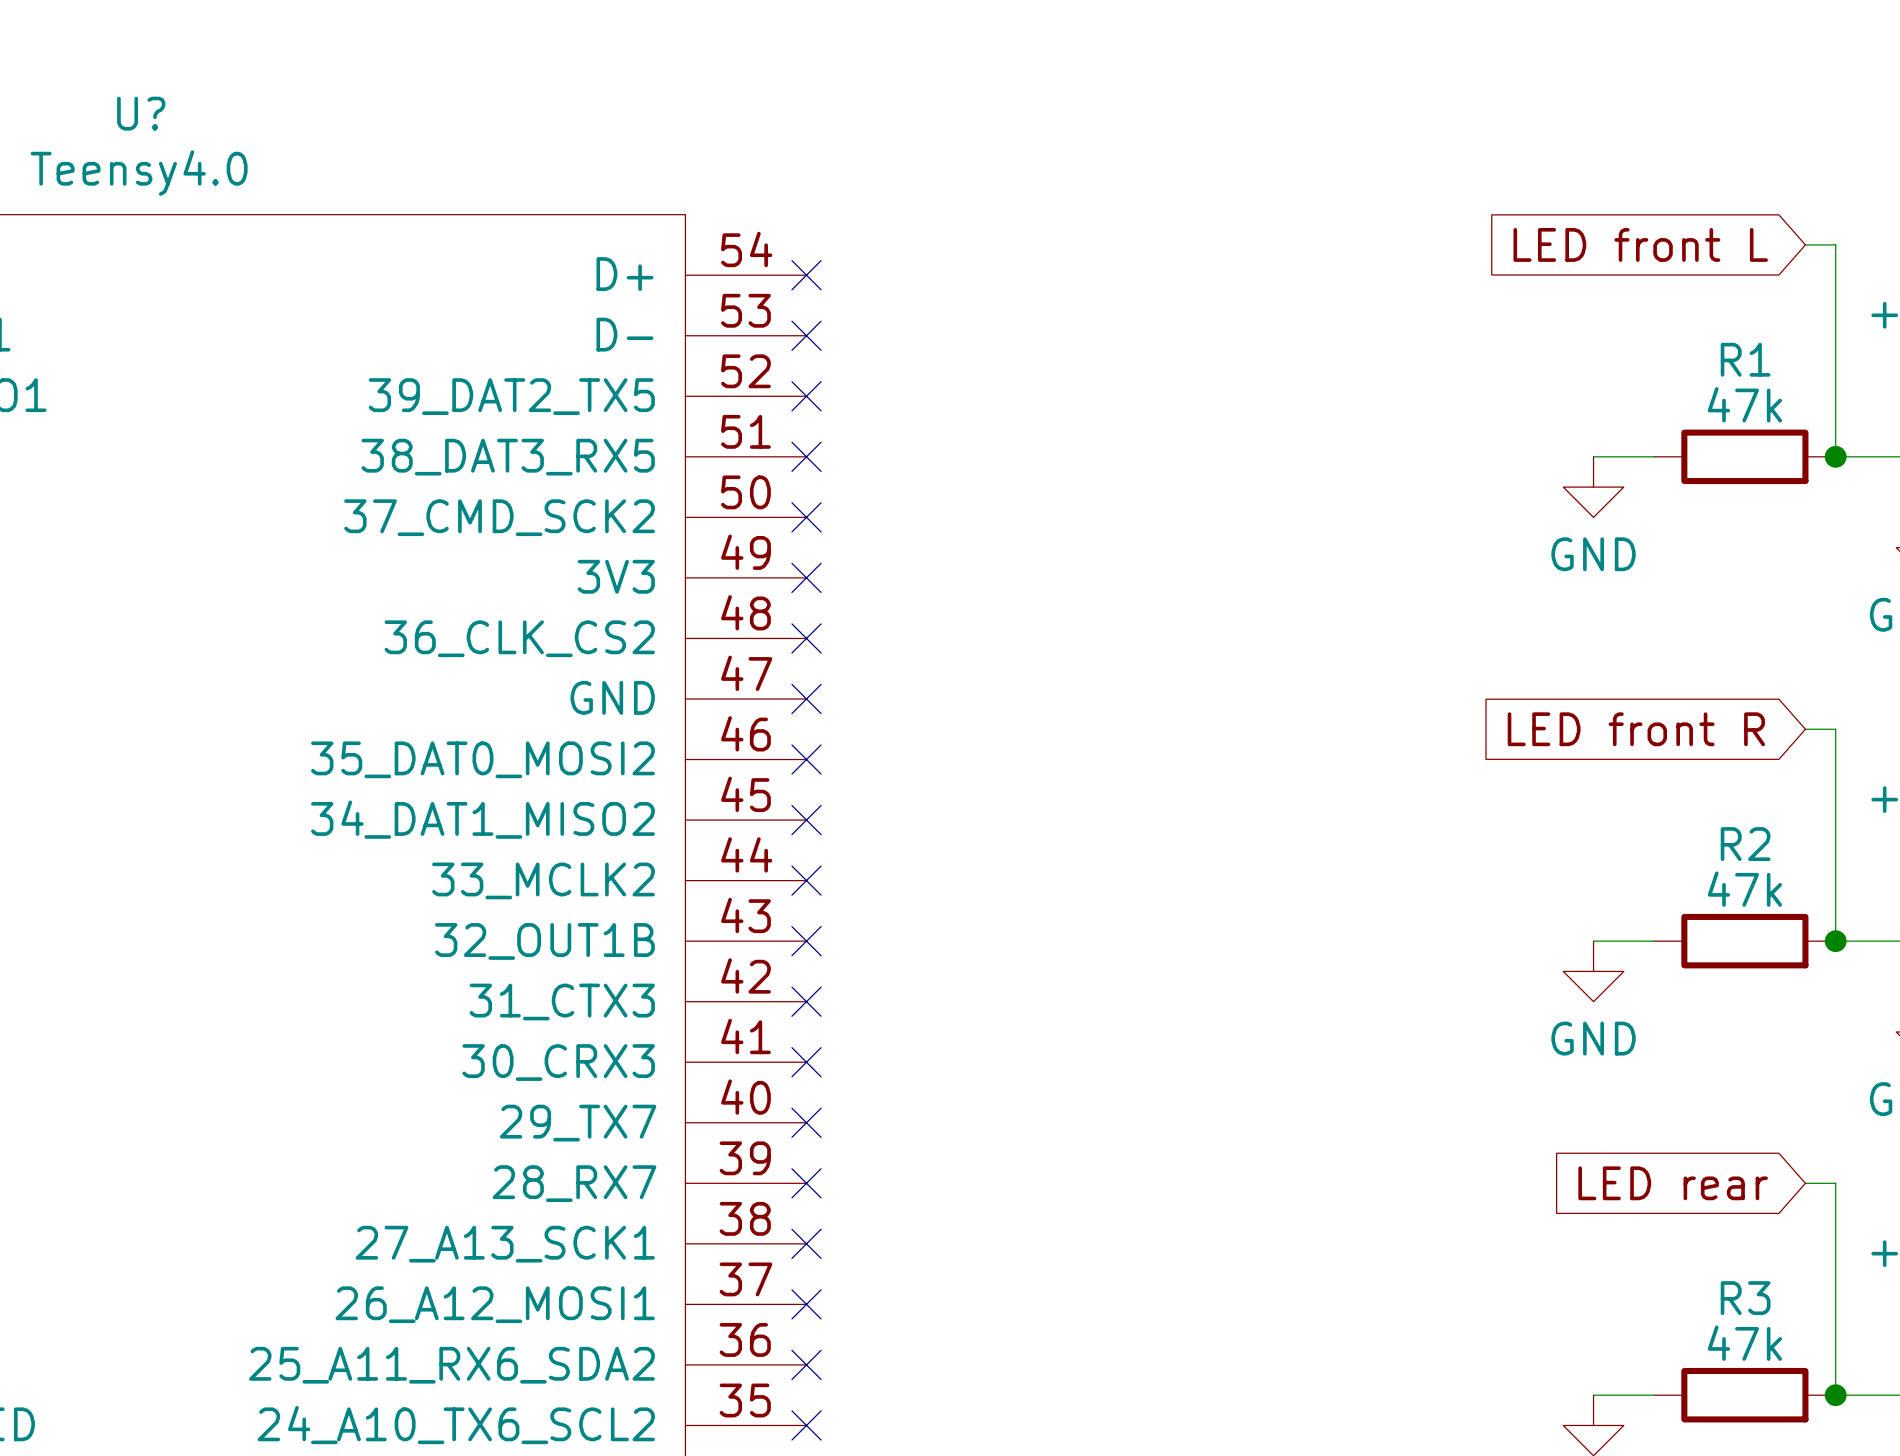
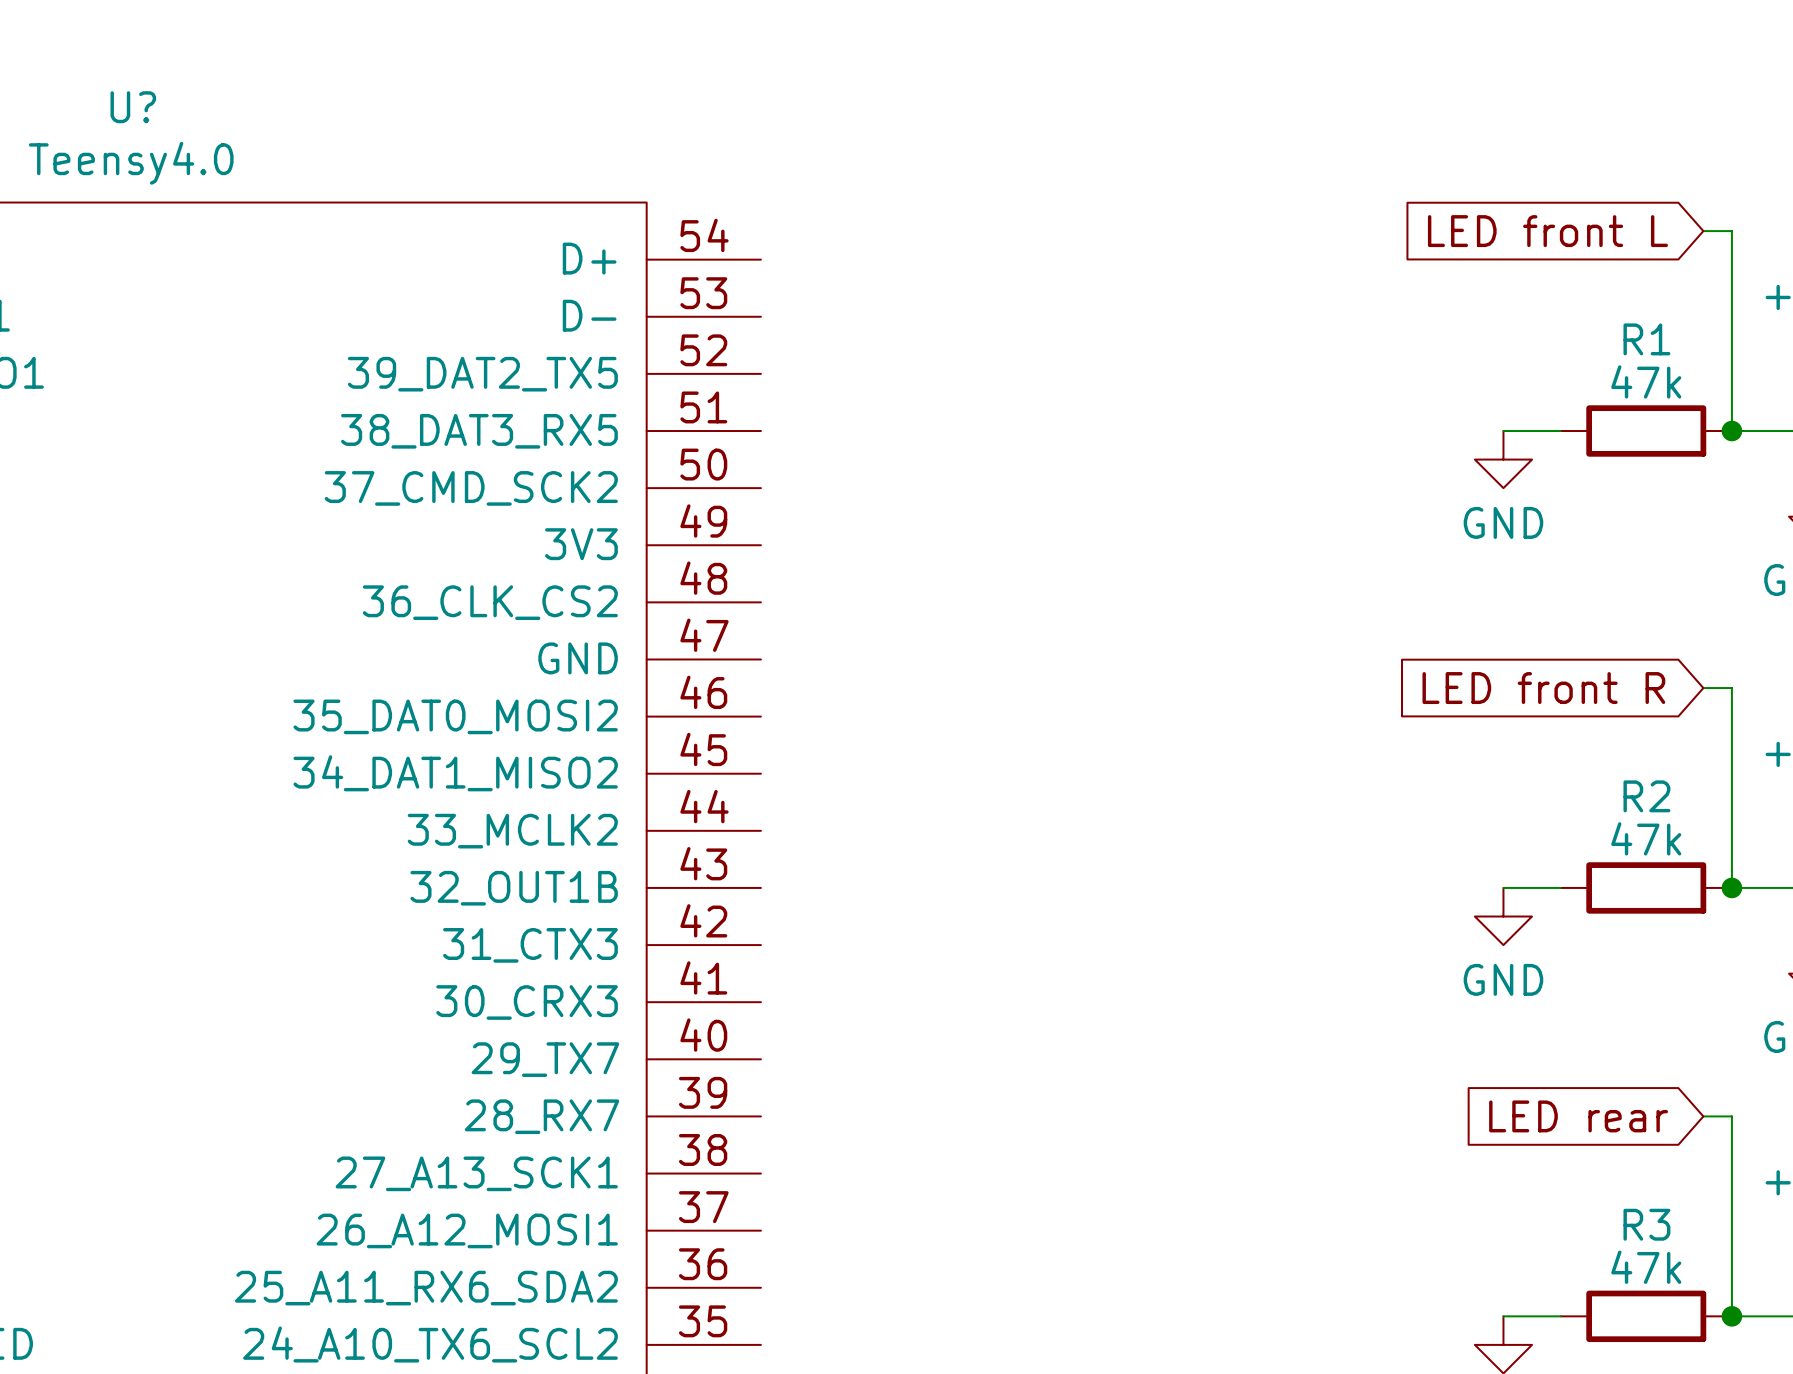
no-connect mark: (806, 275) -> none
no-connect mark: (806, 335) -> none
no-connect mark: (806, 396) -> none
no-connect mark: (806, 456) -> none
no-connect mark: (806, 517) -> none
no-connect mark: (806, 577) -> none
no-connect mark: (806, 638) -> none
no-connect mark: (806, 698) -> none
no-connect mark: (806, 759) -> none
no-connect mark: (806, 820) -> none
no-connect mark: (806, 880) -> none
no-connect mark: (806, 941) -> none
no-connect mark: (806, 1001) -> none
no-connect mark: (806, 1062) -> none
no-connect mark: (806, 1122) -> none
no-connect mark: (806, 1183) -> none
no-connect mark: (806, 1243) -> none
no-connect mark: (806, 1304) -> none
no-connect mark: (806, 1364) -> none
no-connect mark: (806, 1425) -> none

